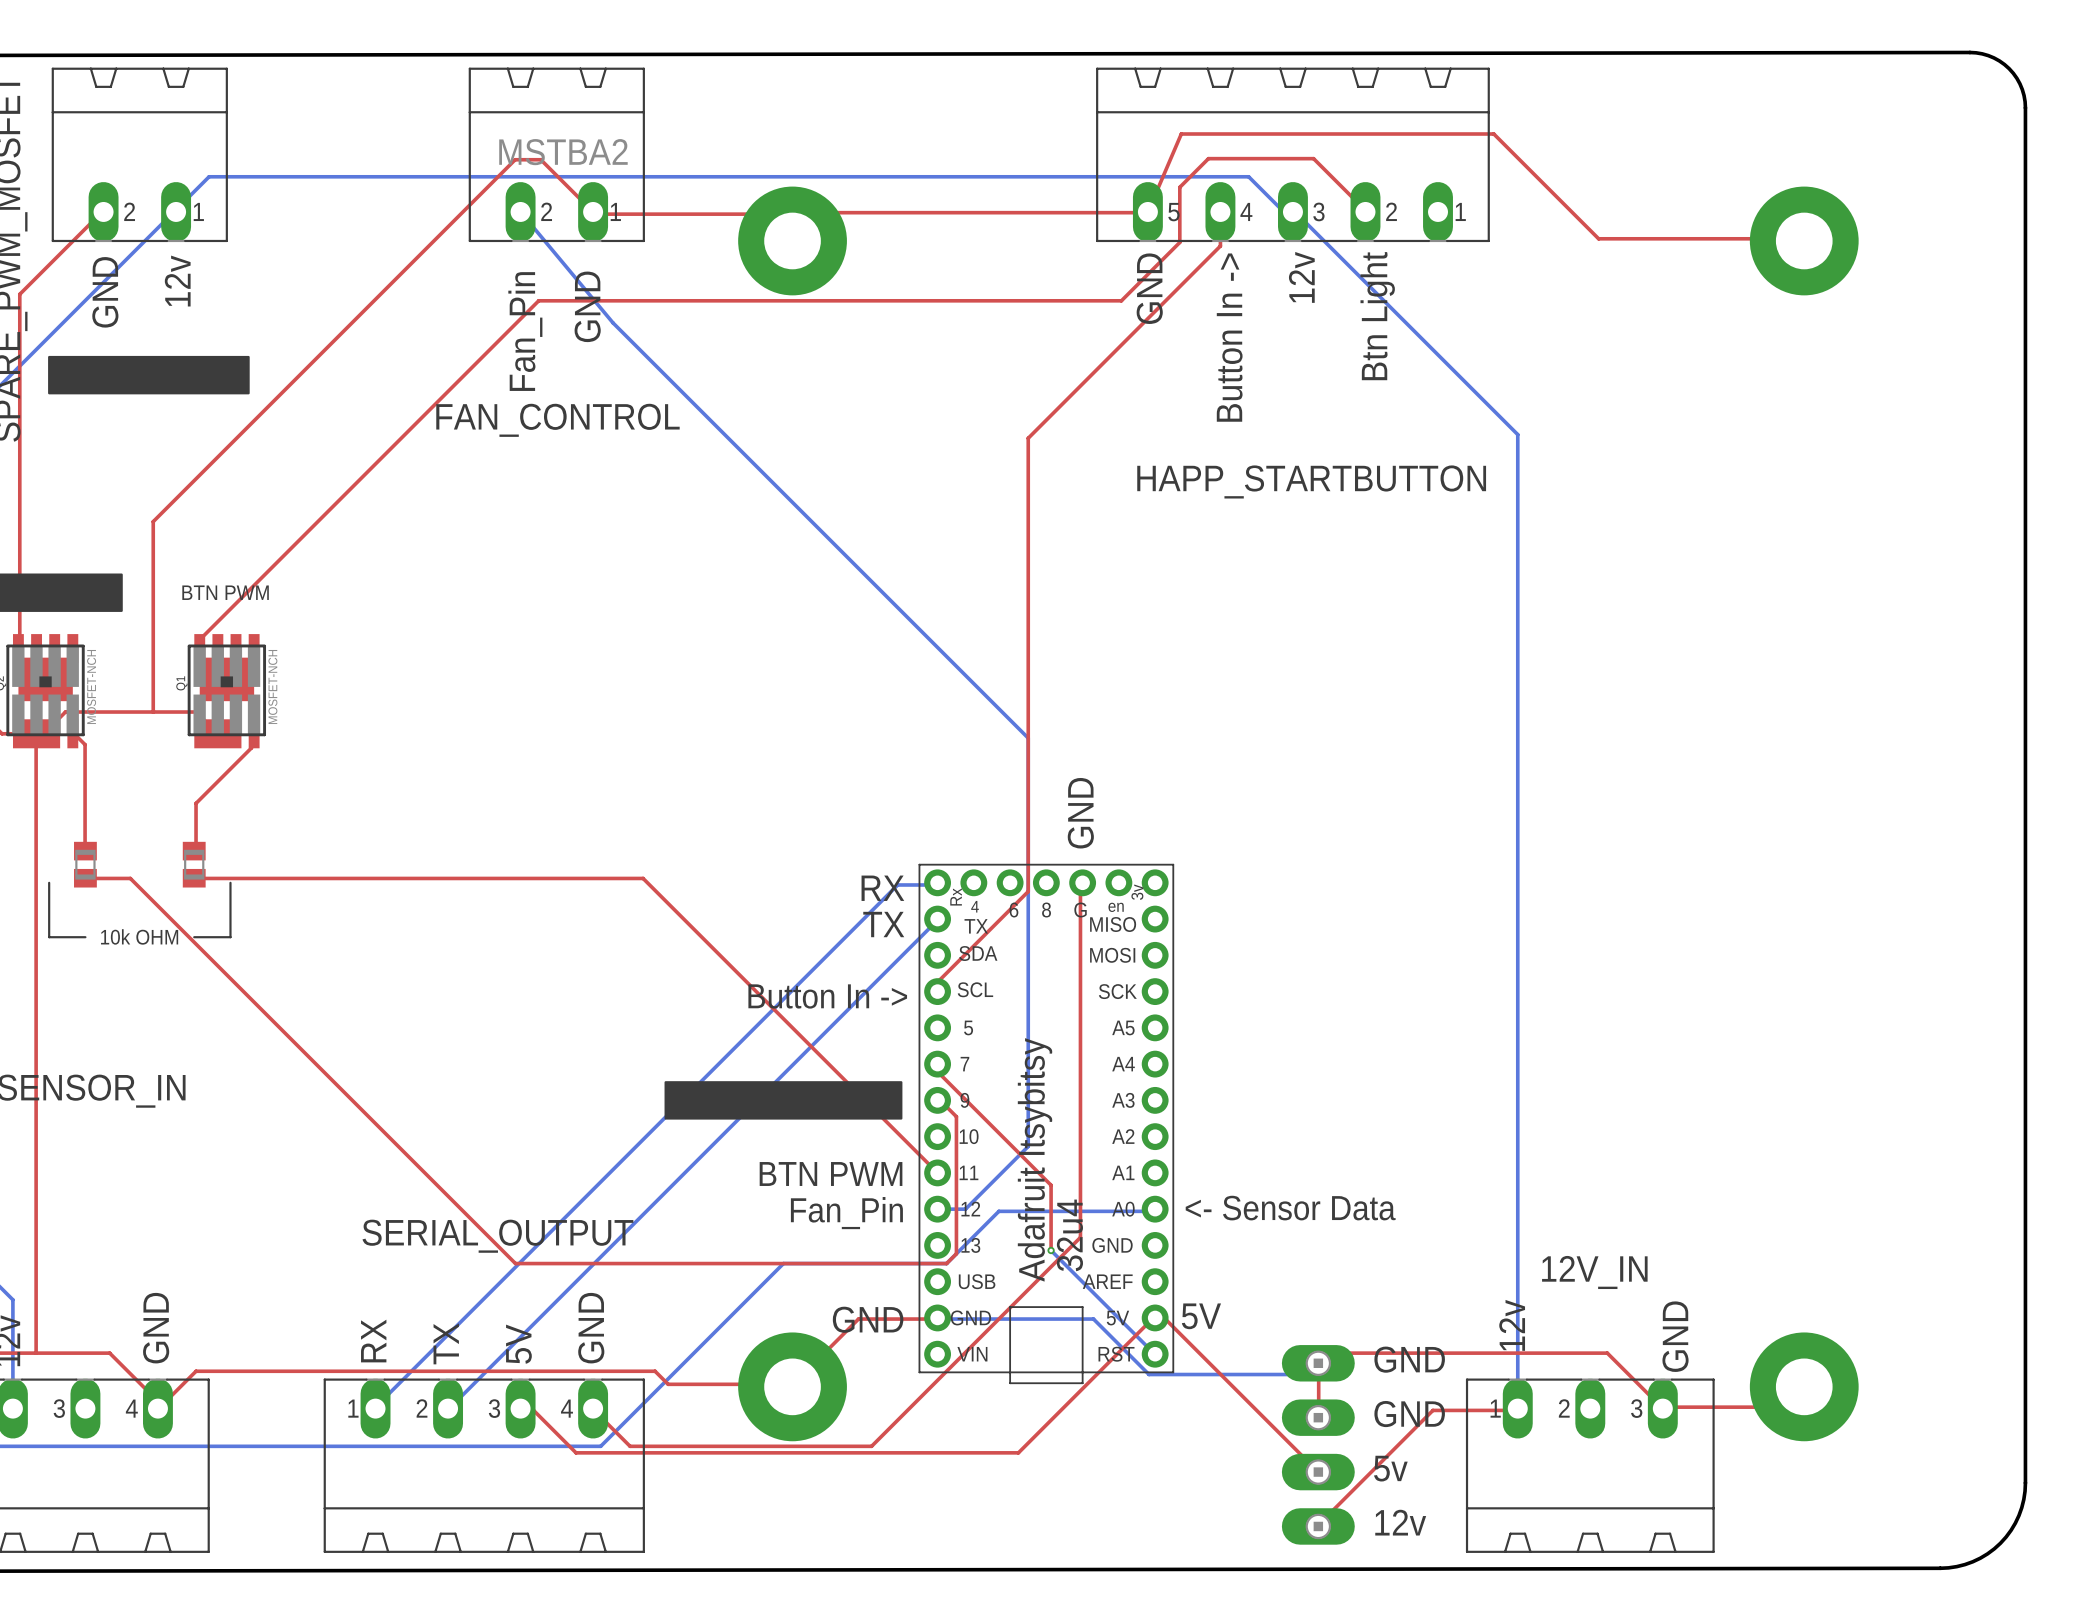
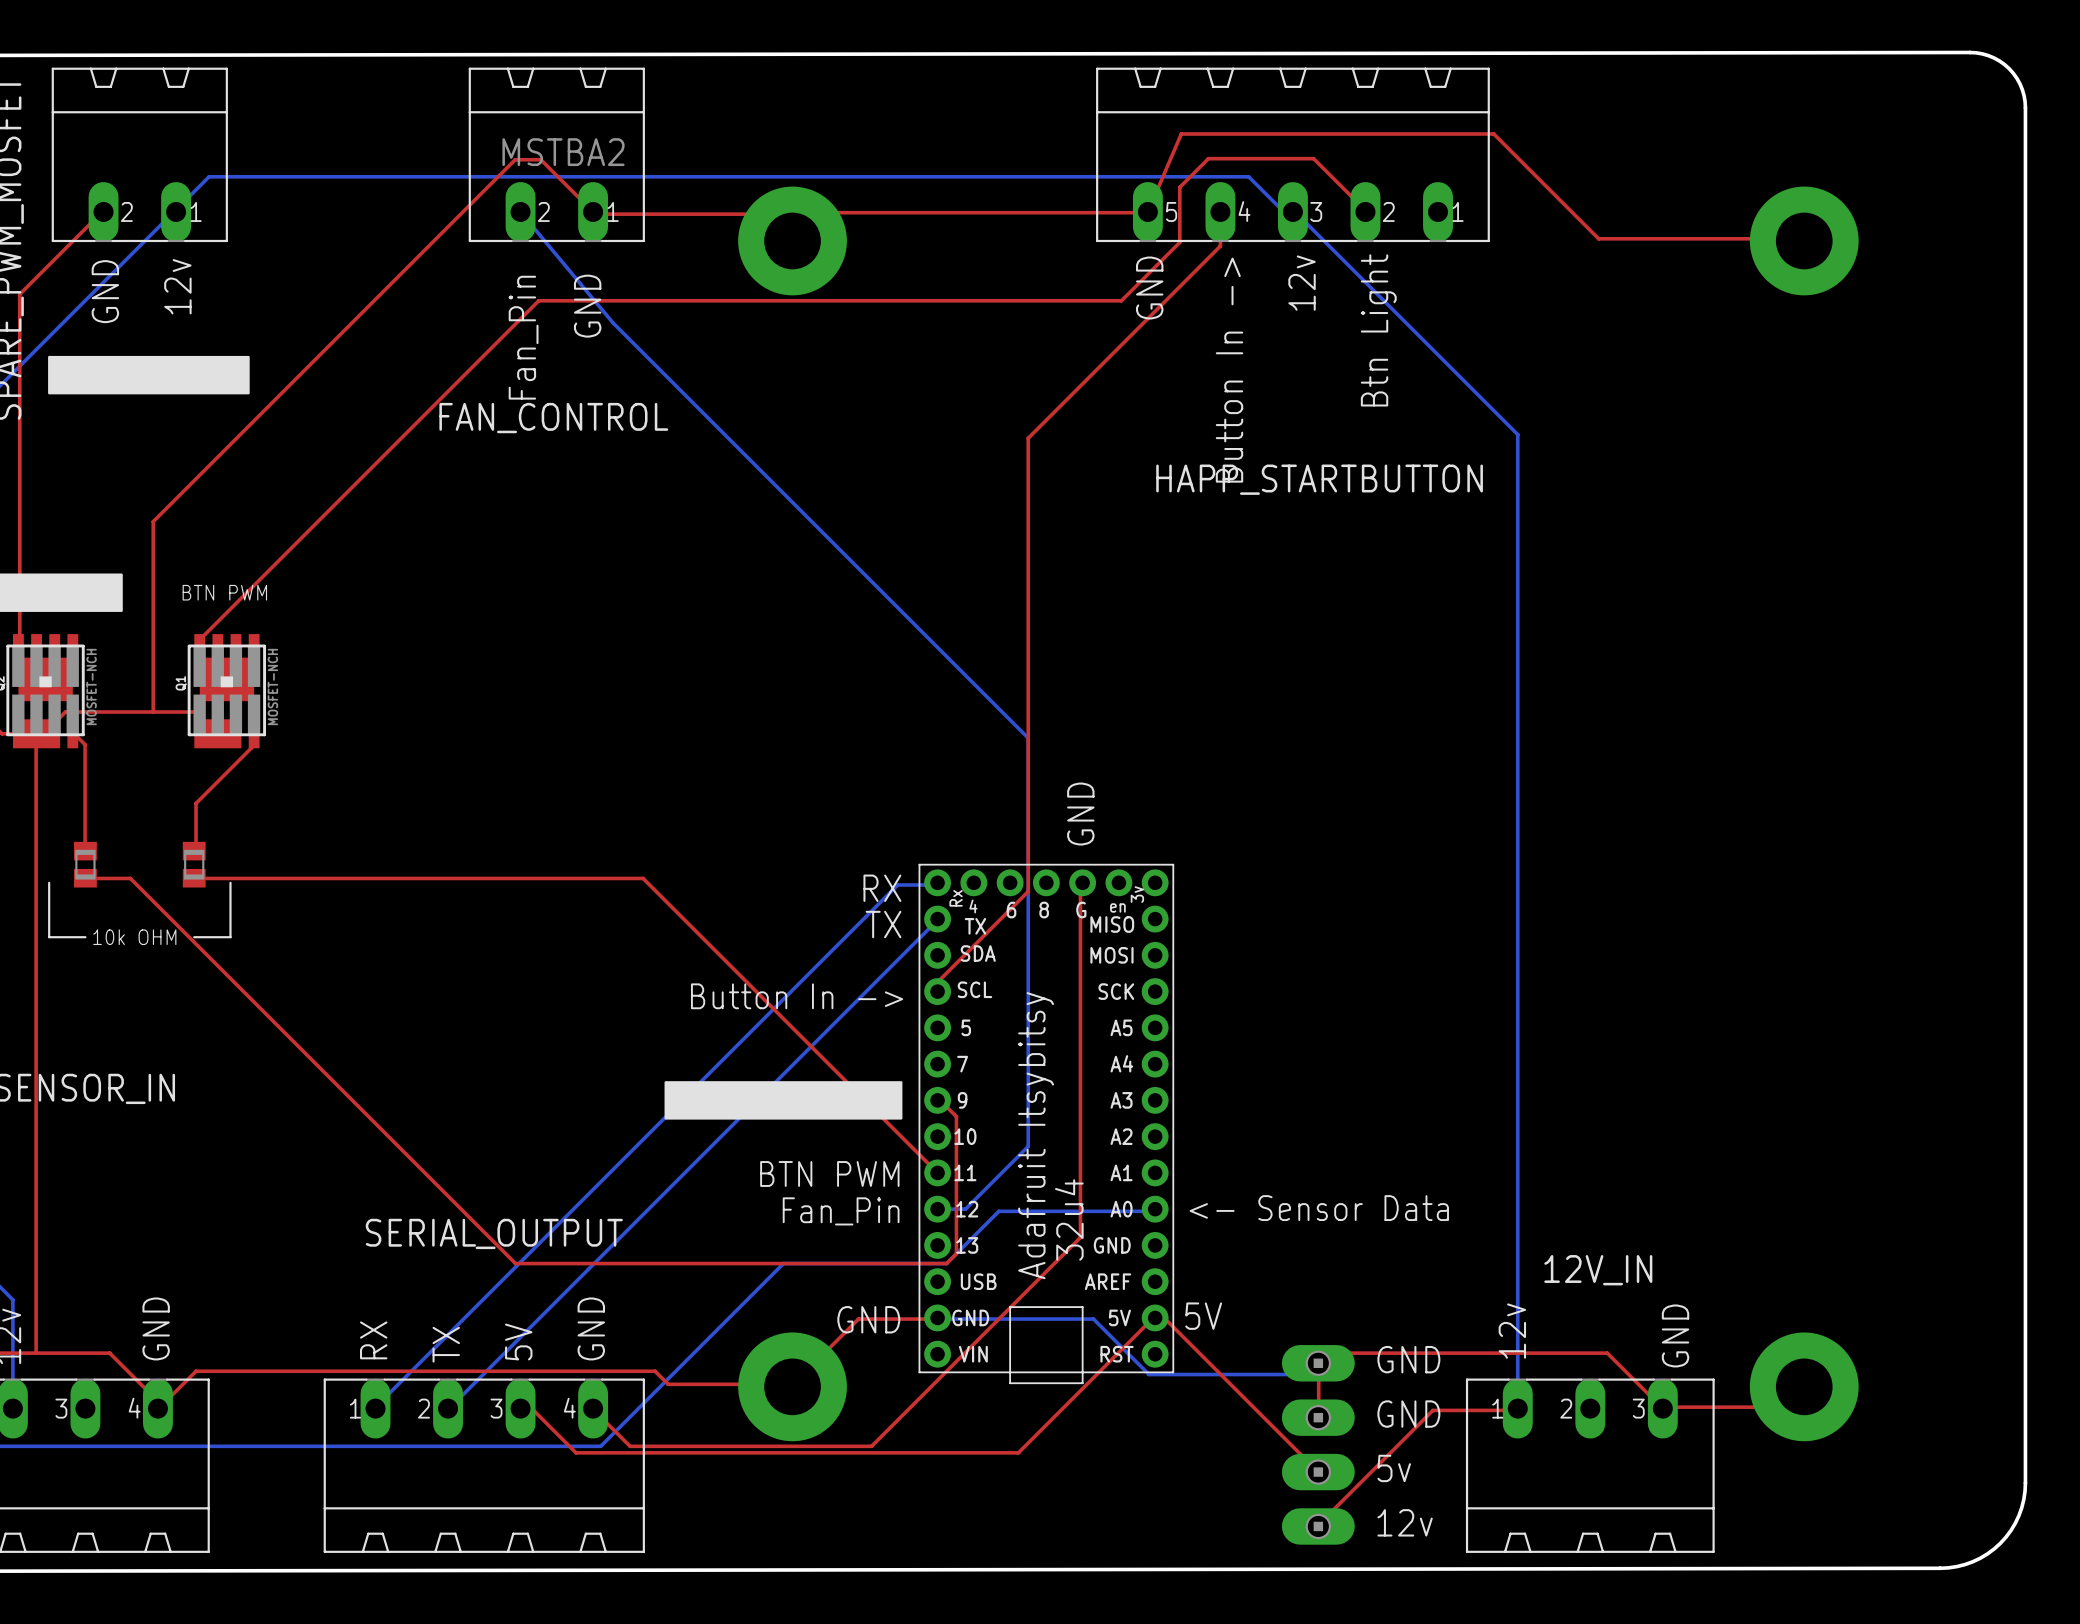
top track: (937, 1064) (940, 1064) (940, 1074) (1051, 1185) (1051, 1250) -> none
bottom track: (1051, 1250) (1155, 1354) -> none
via: (1051, 1250) -> none

